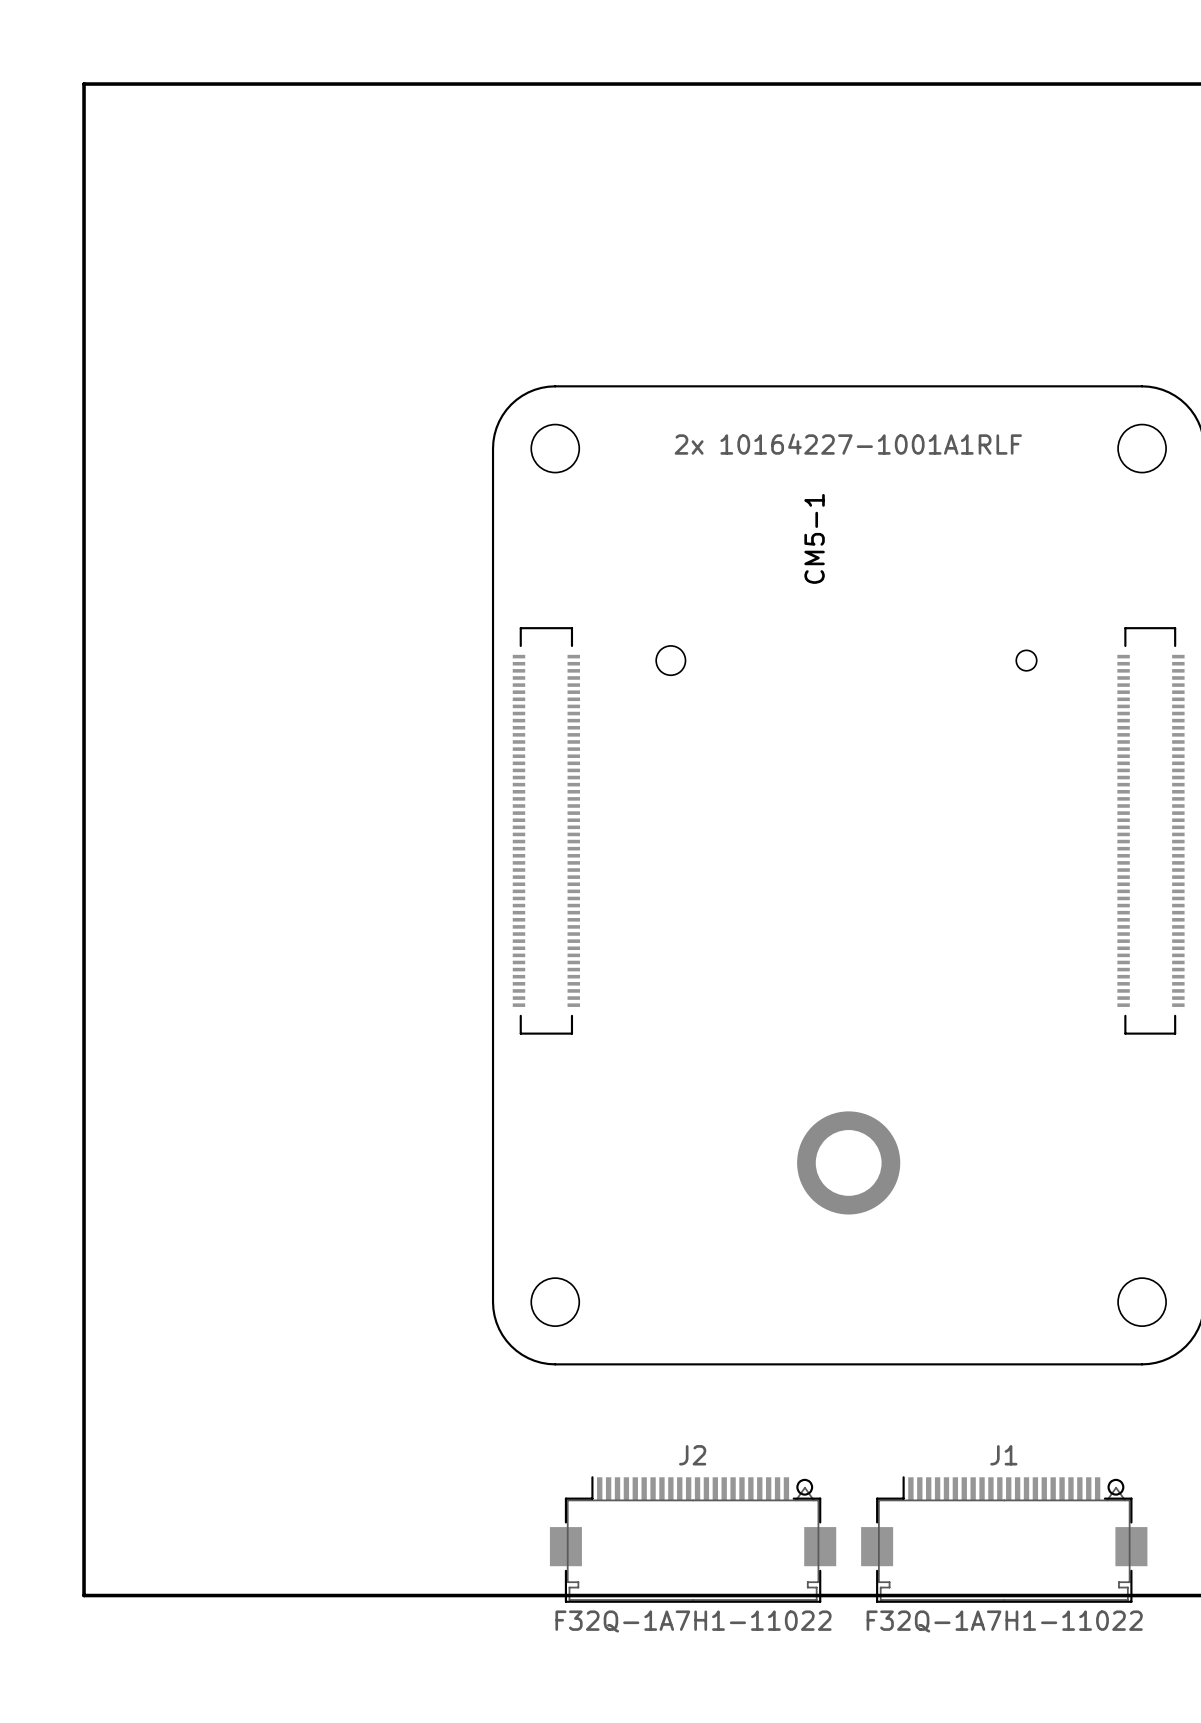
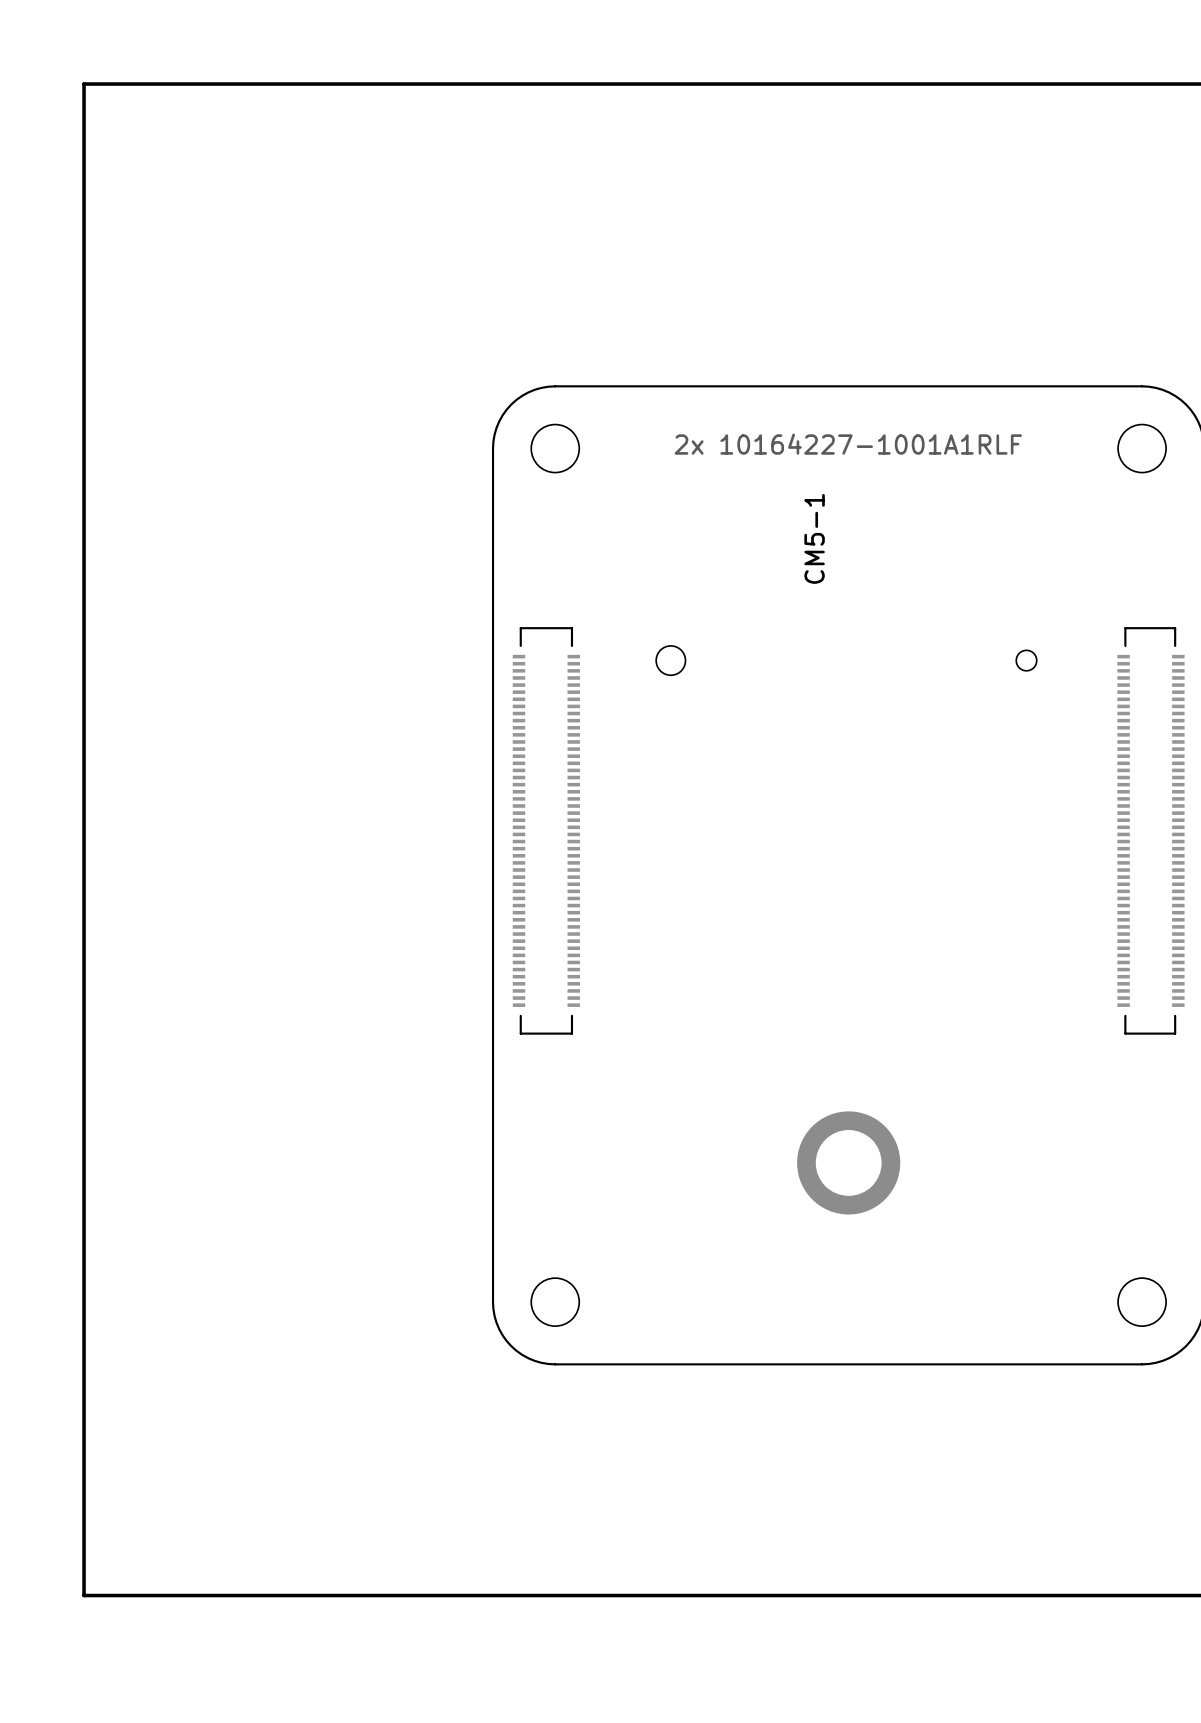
J2: F32Q-1A7H1-11022 (693, 1539) -> none
J1: F32Q-1A7H1-11022 (1004, 1539) -> none

